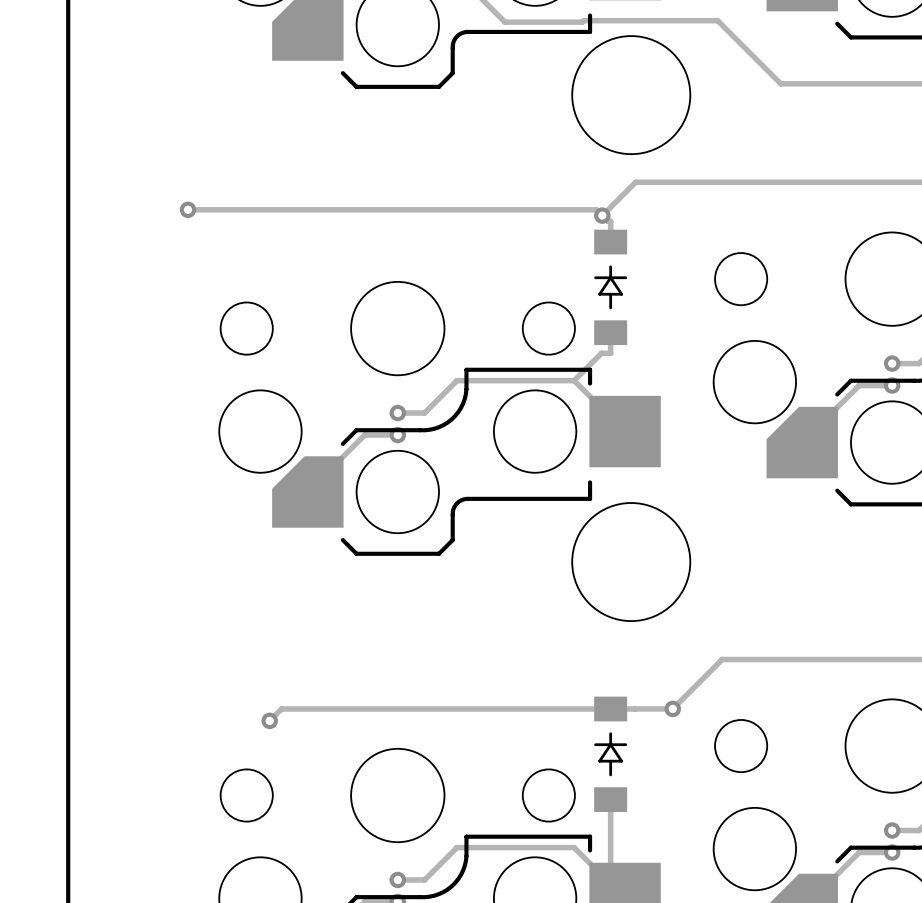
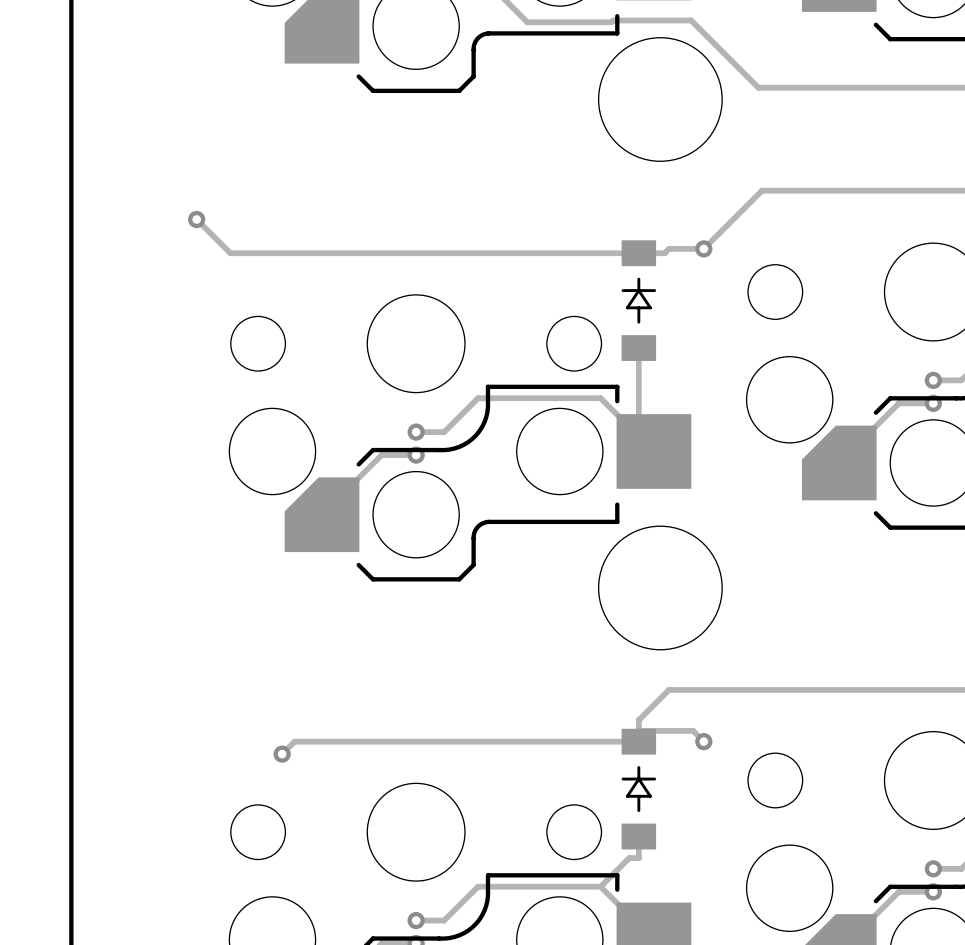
track: (504, 21) (717, 20) (780, 83) -> (527, 22) (691, 20) (758, 87) (816, 87)
track: (728, 182) (635, 182) (602, 215) -> none
track: (188, 209) (596, 209) (608, 221) (610, 221) (610, 242) -> (196, 219) (230, 253) (664, 253) (669, 248) (703, 248) (762, 190)
via position: (602, 215) -> (703, 248)
track: (610, 353) (601, 353) (574, 380) -> (638, 369) (638, 424) (632, 430)
track: (722, 659) (672, 708) (610, 708) -> (755, 689) (668, 689) (638, 720) (638, 741)
track: none -> (638, 730) (693, 730) (703, 741)
track: (610, 820) (610, 872) (604, 878) -> (638, 858) (629, 858) (600, 886)

